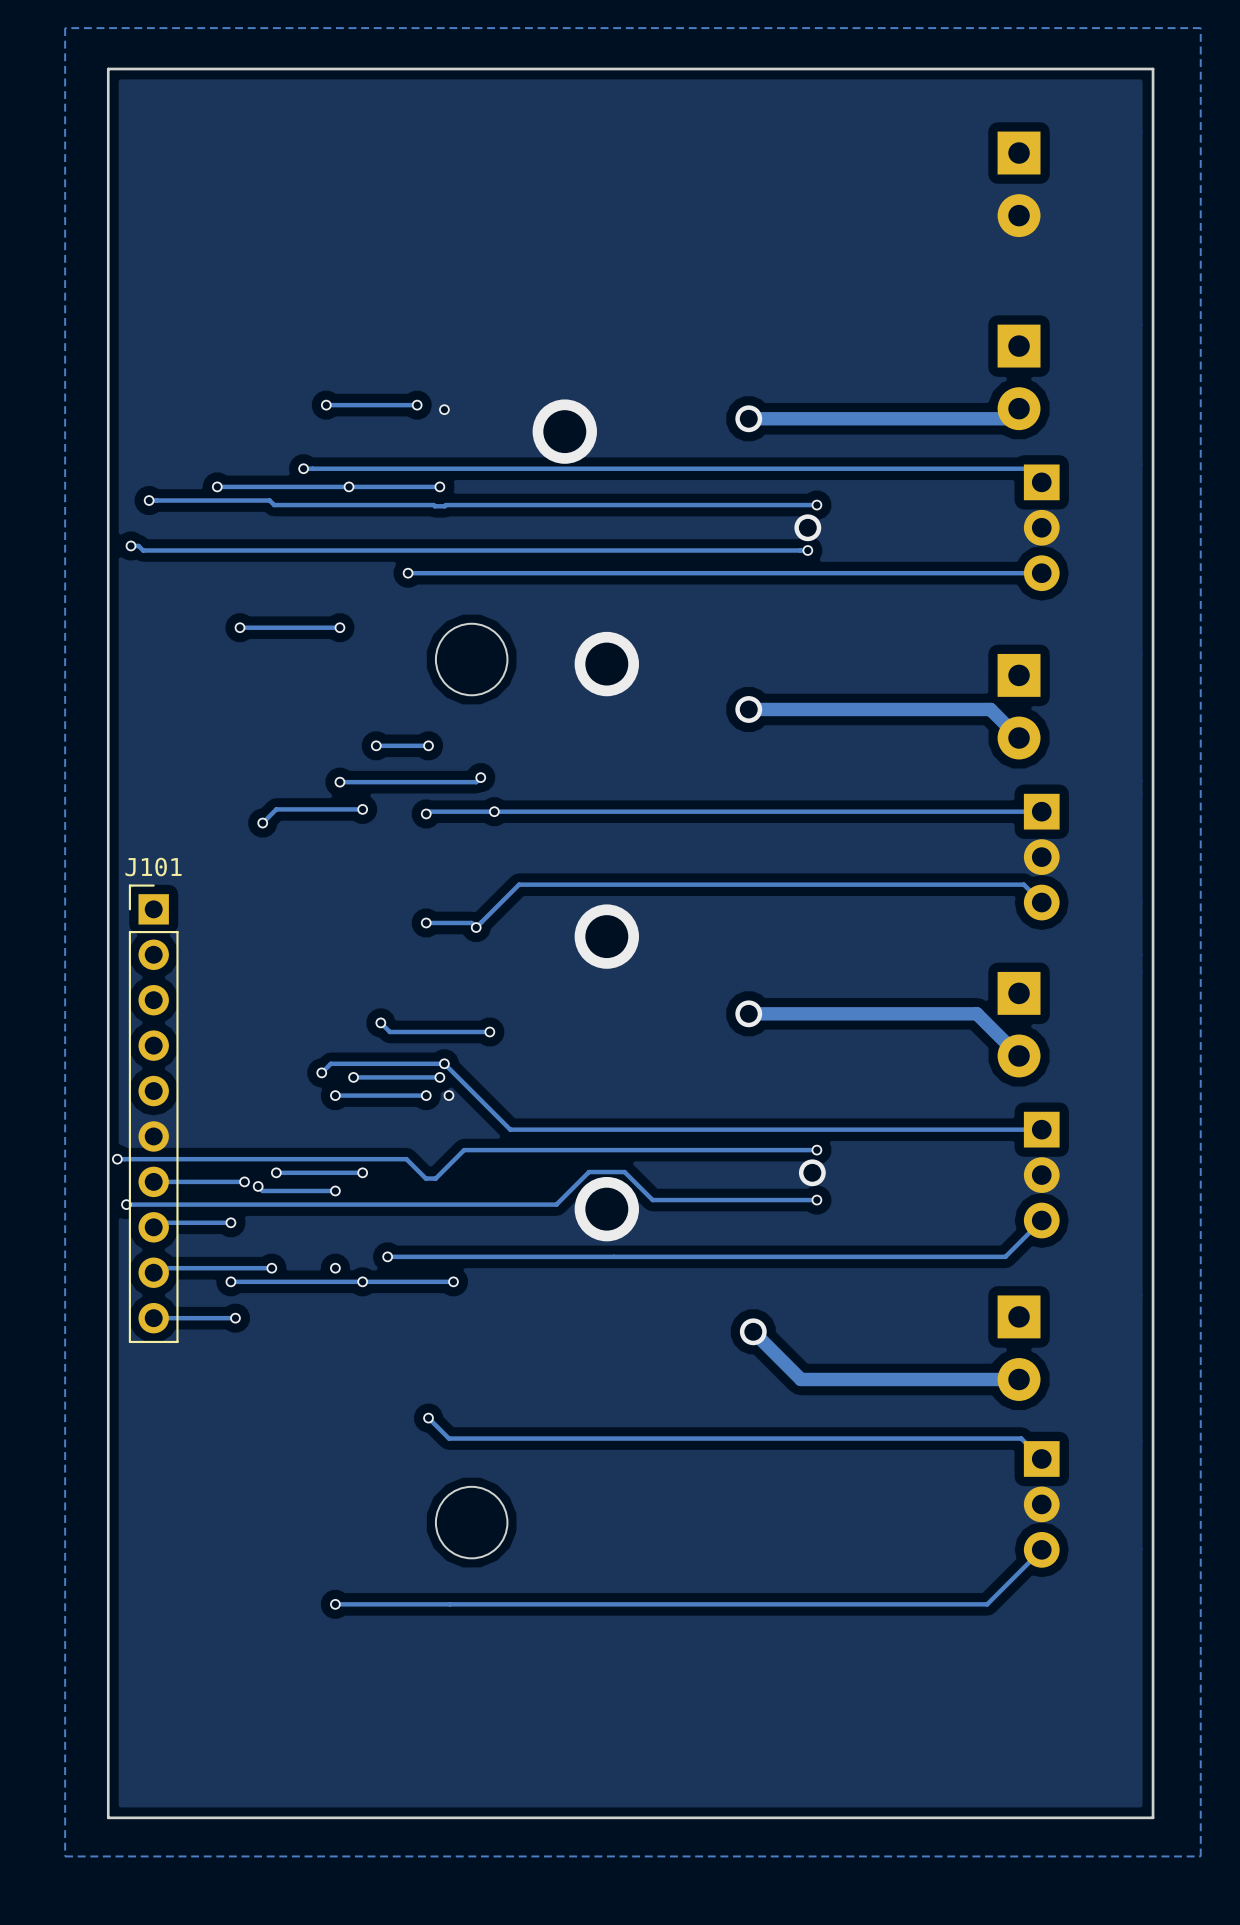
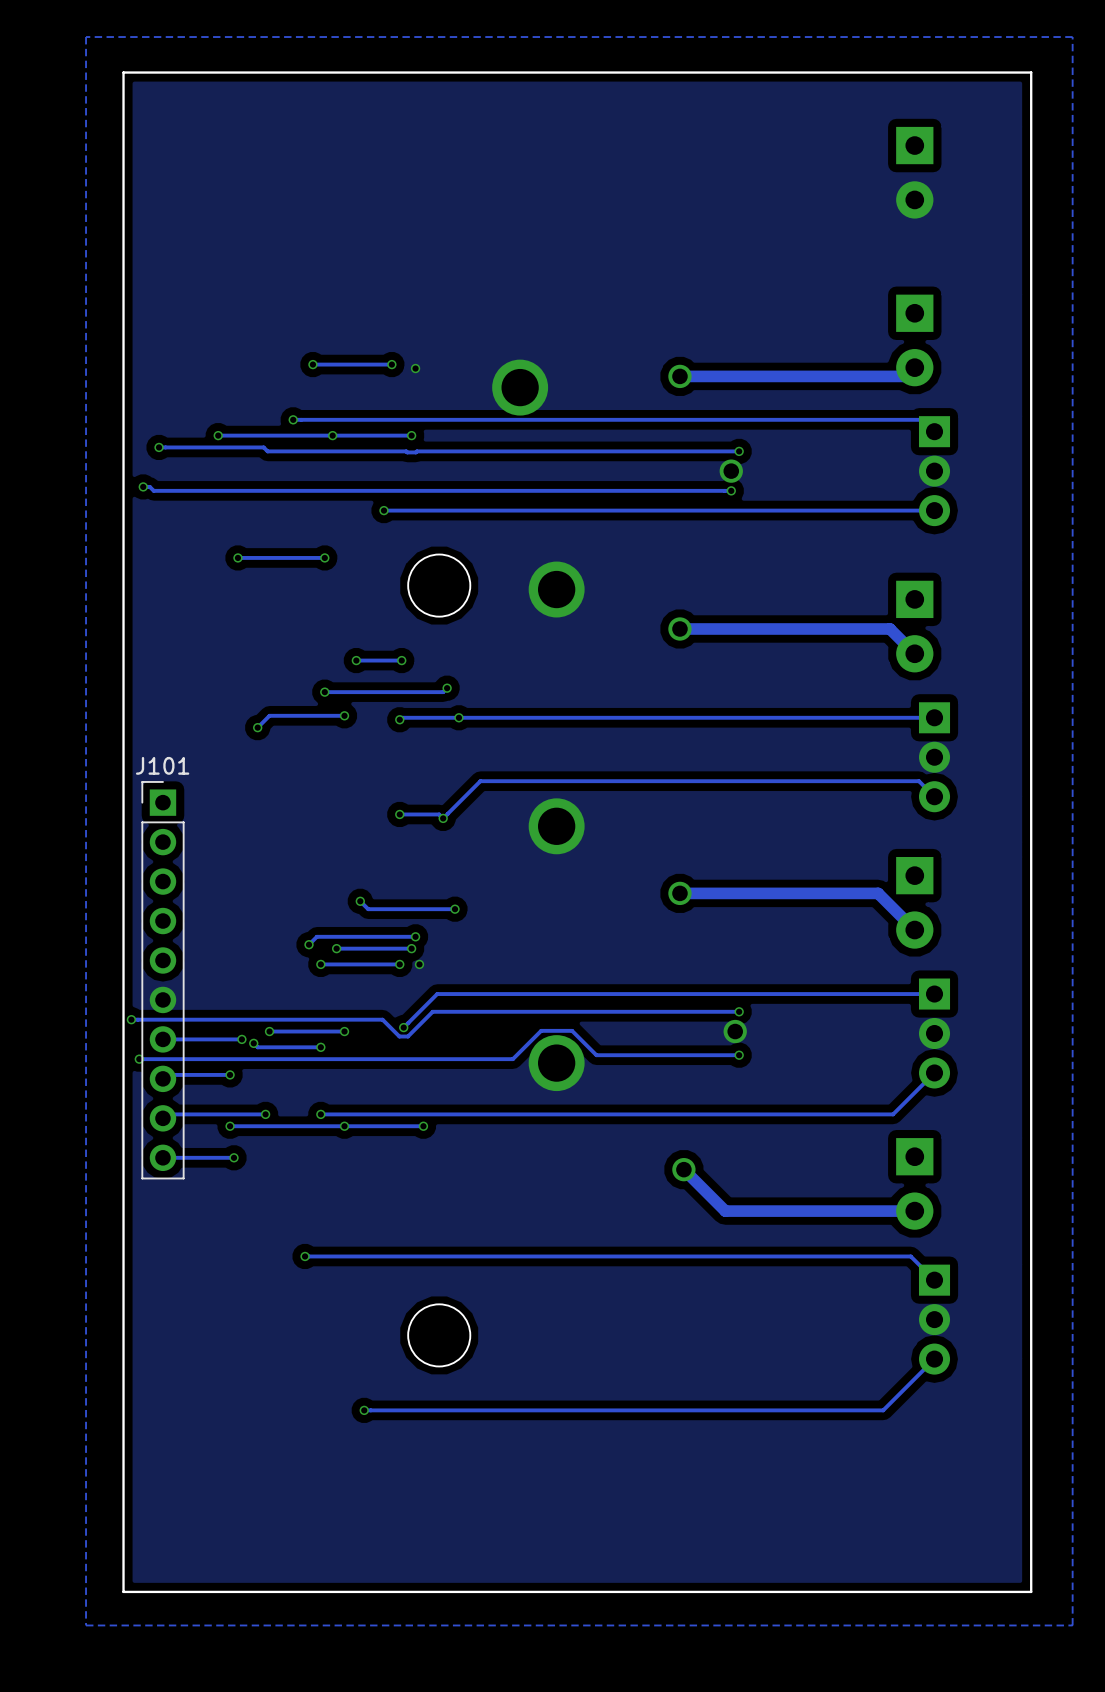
track: (444, 1063) (510, 1129) -> (403, 1027) (437, 994) (472, 994)
via: none -> (403, 1027)
via: (387, 1256) -> none
track: (1005, 1256) (387, 1256) -> (902, 1104) (893, 1114) (320, 1114)
track: (428, 1418) (448, 1438) (1021, 1438) -> (305, 1256) (910, 1256) (916, 1262)
via: (428, 1418) -> none
via: none -> (305, 1256)
via position: (335, 1604) -> (364, 1410)
track: (987, 1604) (335, 1604) -> (887, 1406) (883, 1410) (364, 1410)

